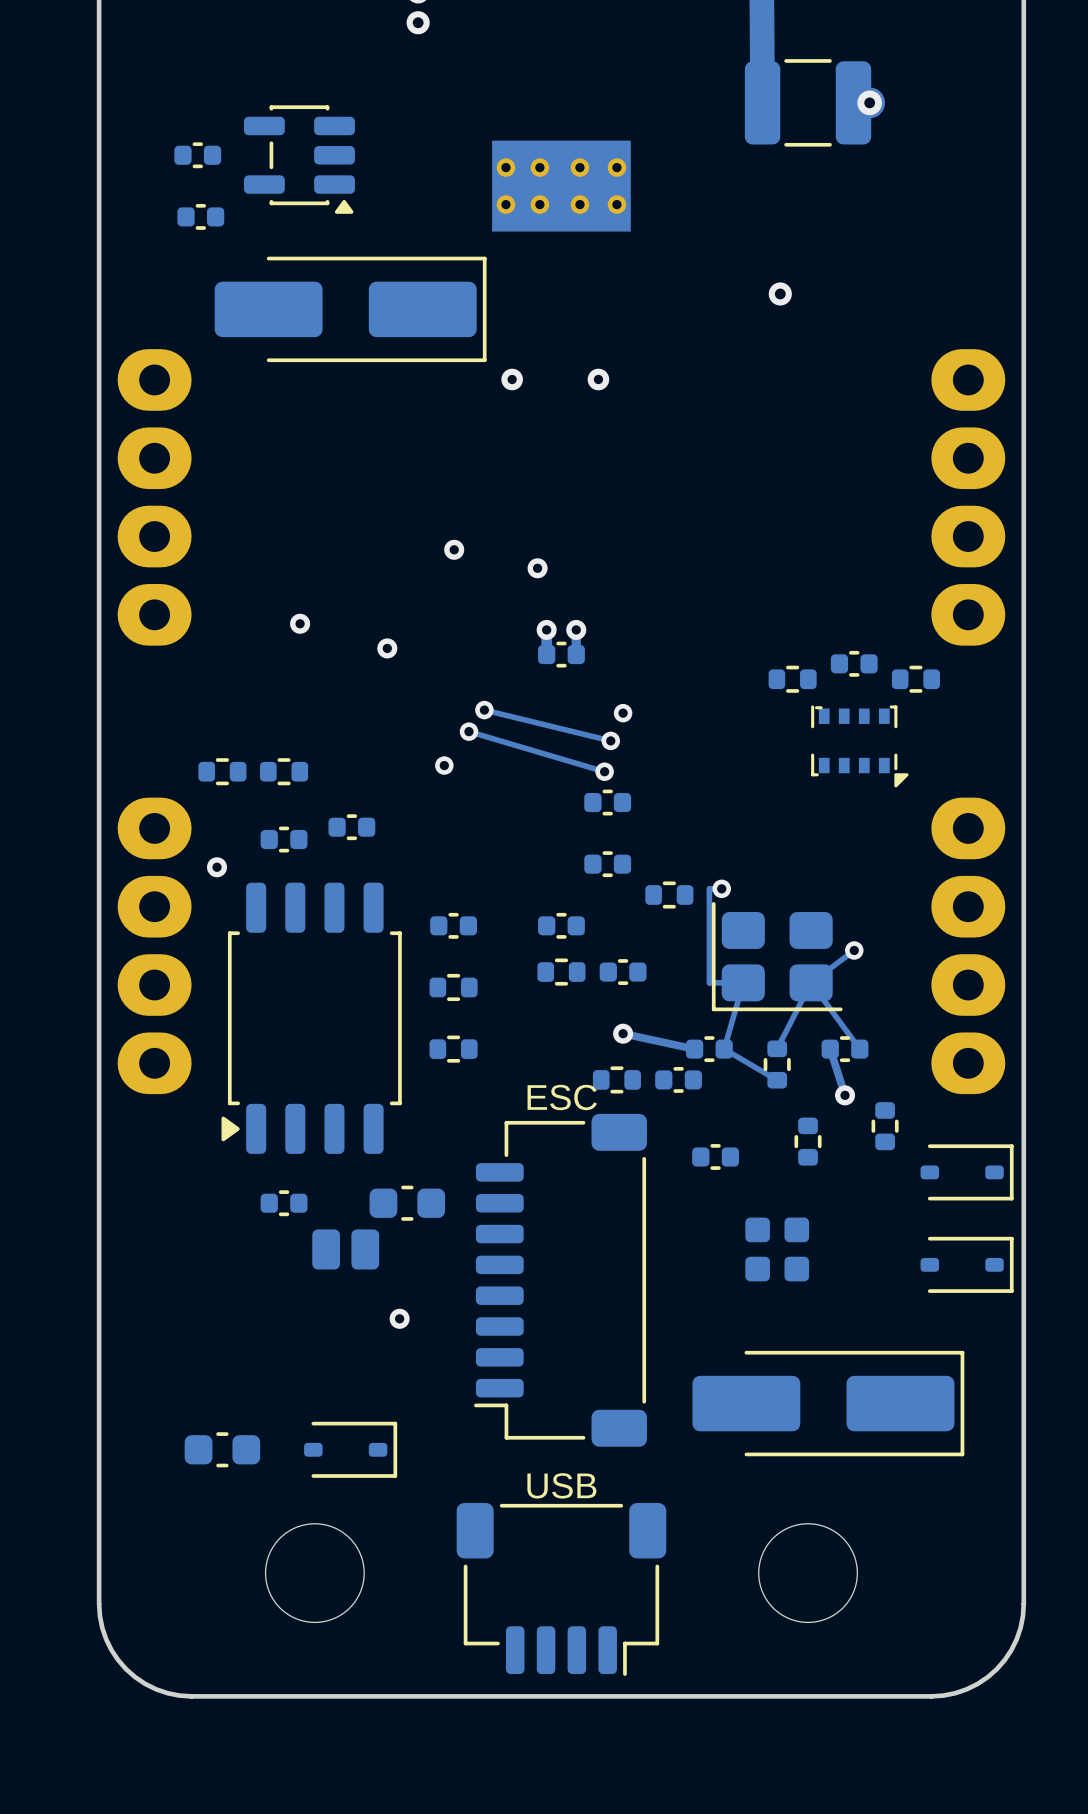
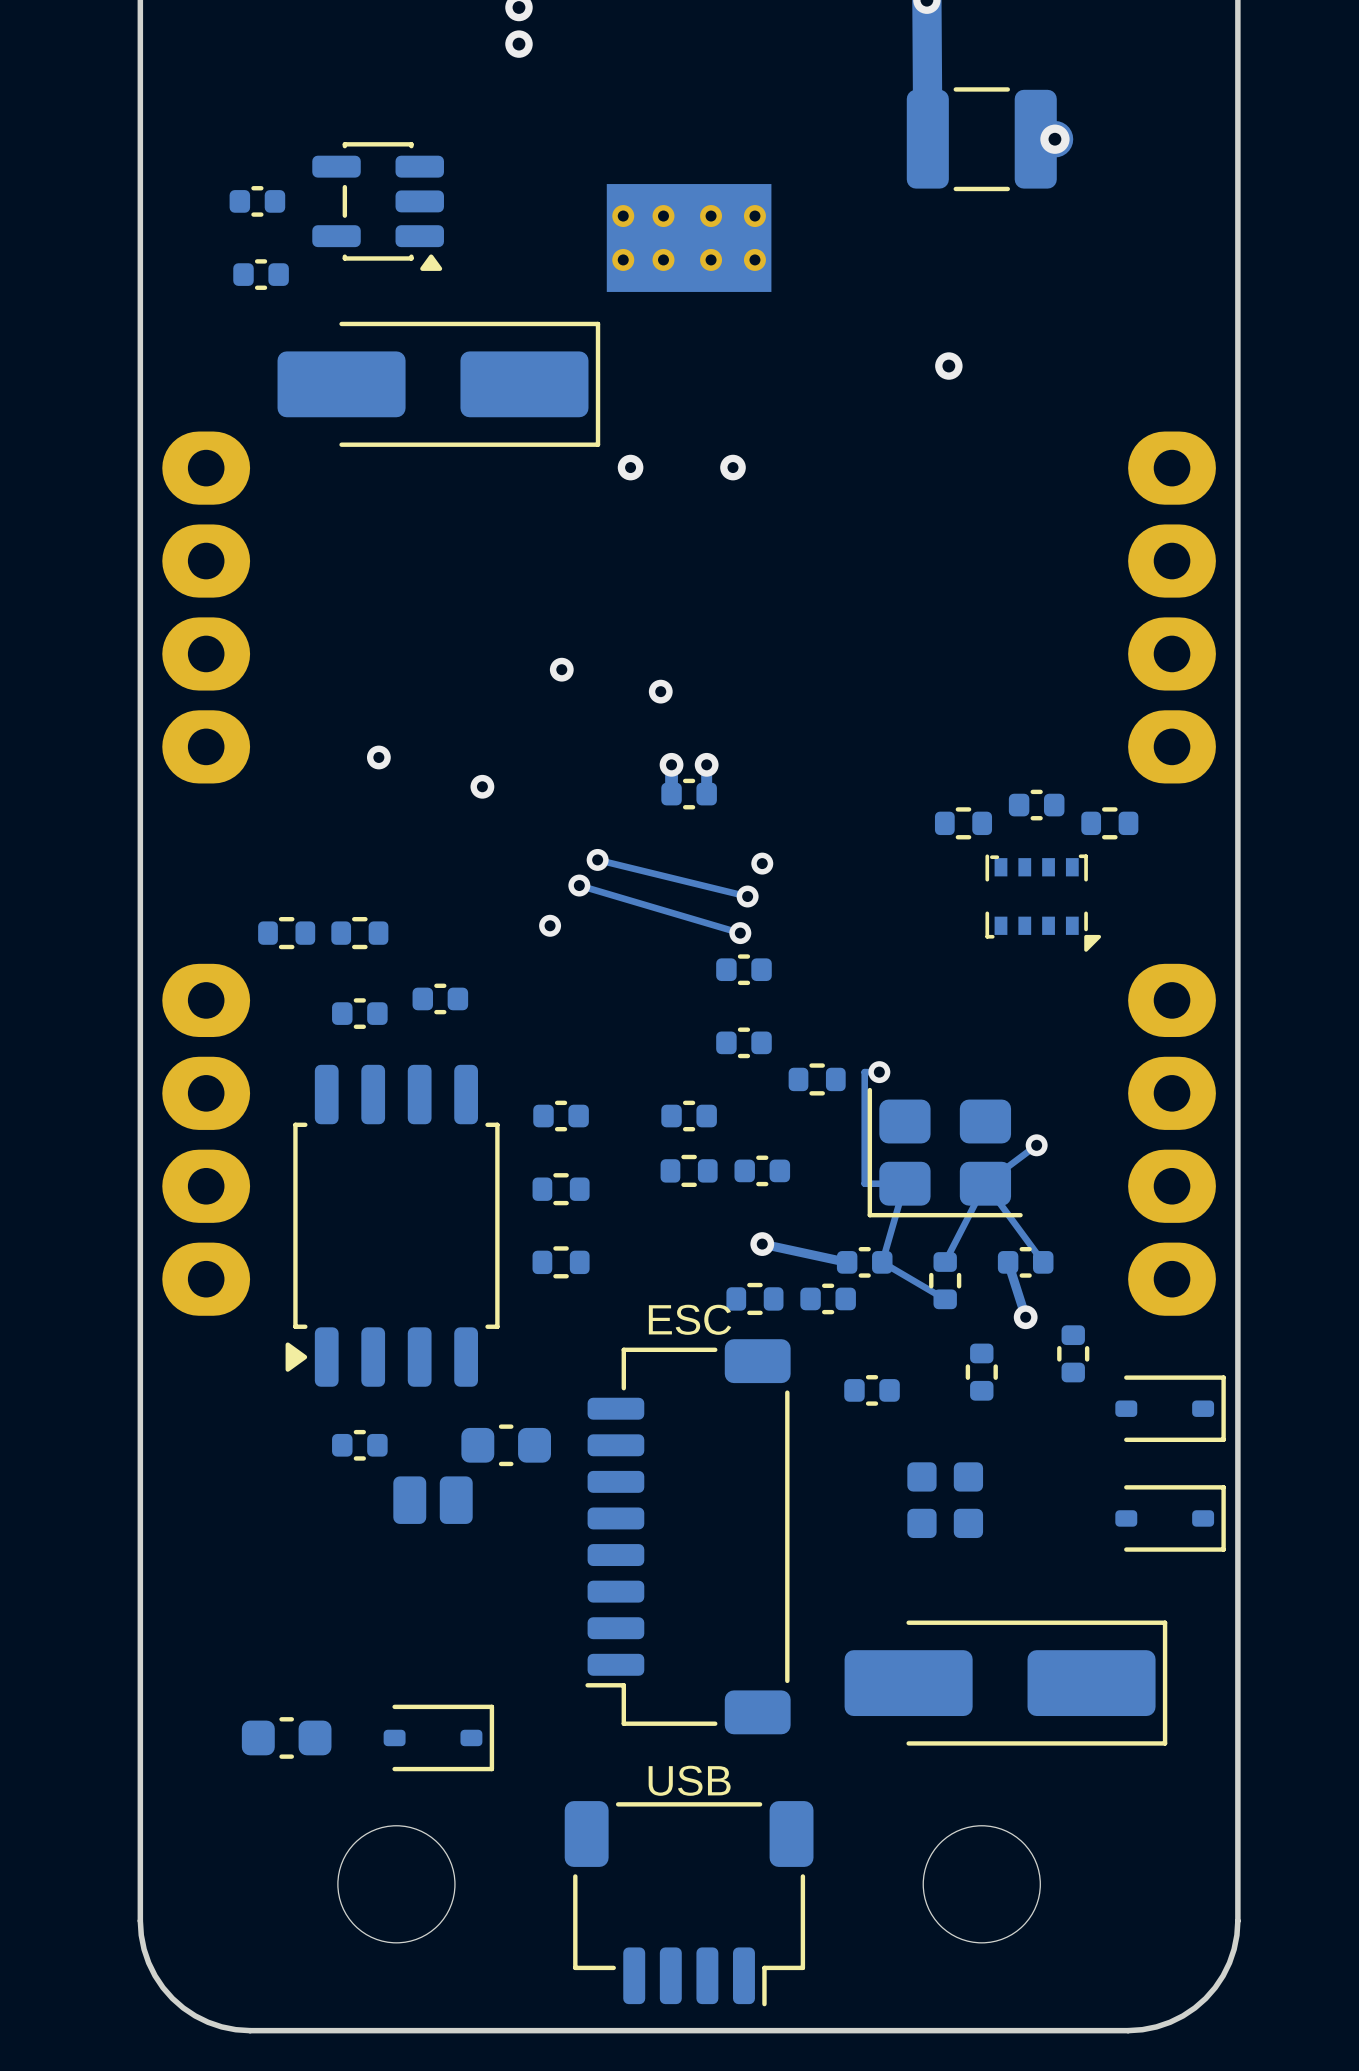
via: (217, 867) -> none
via: (399, 1318) -> none

